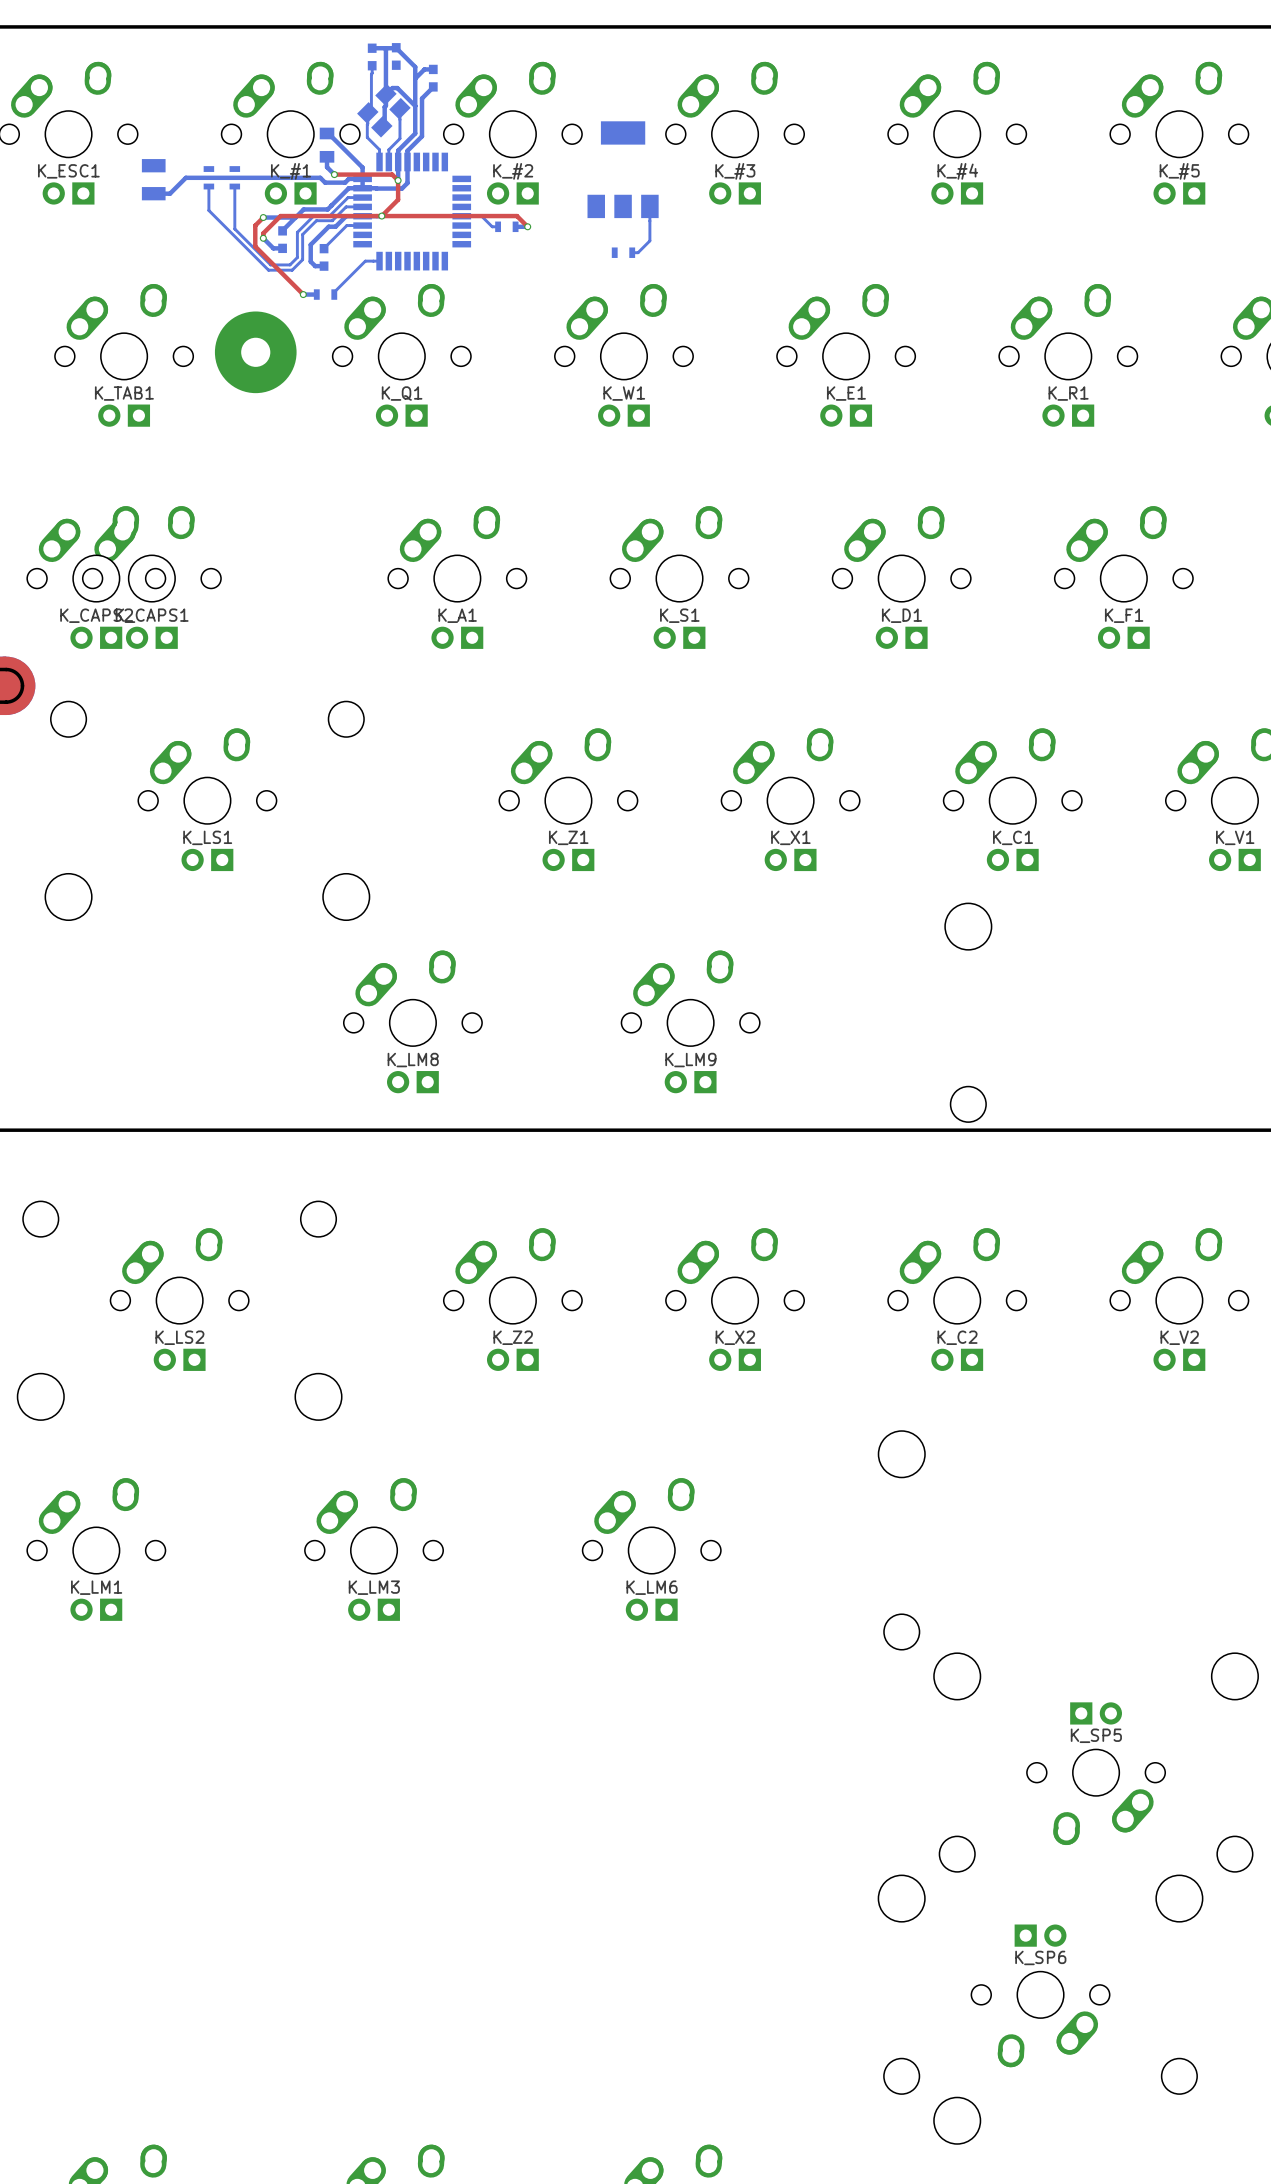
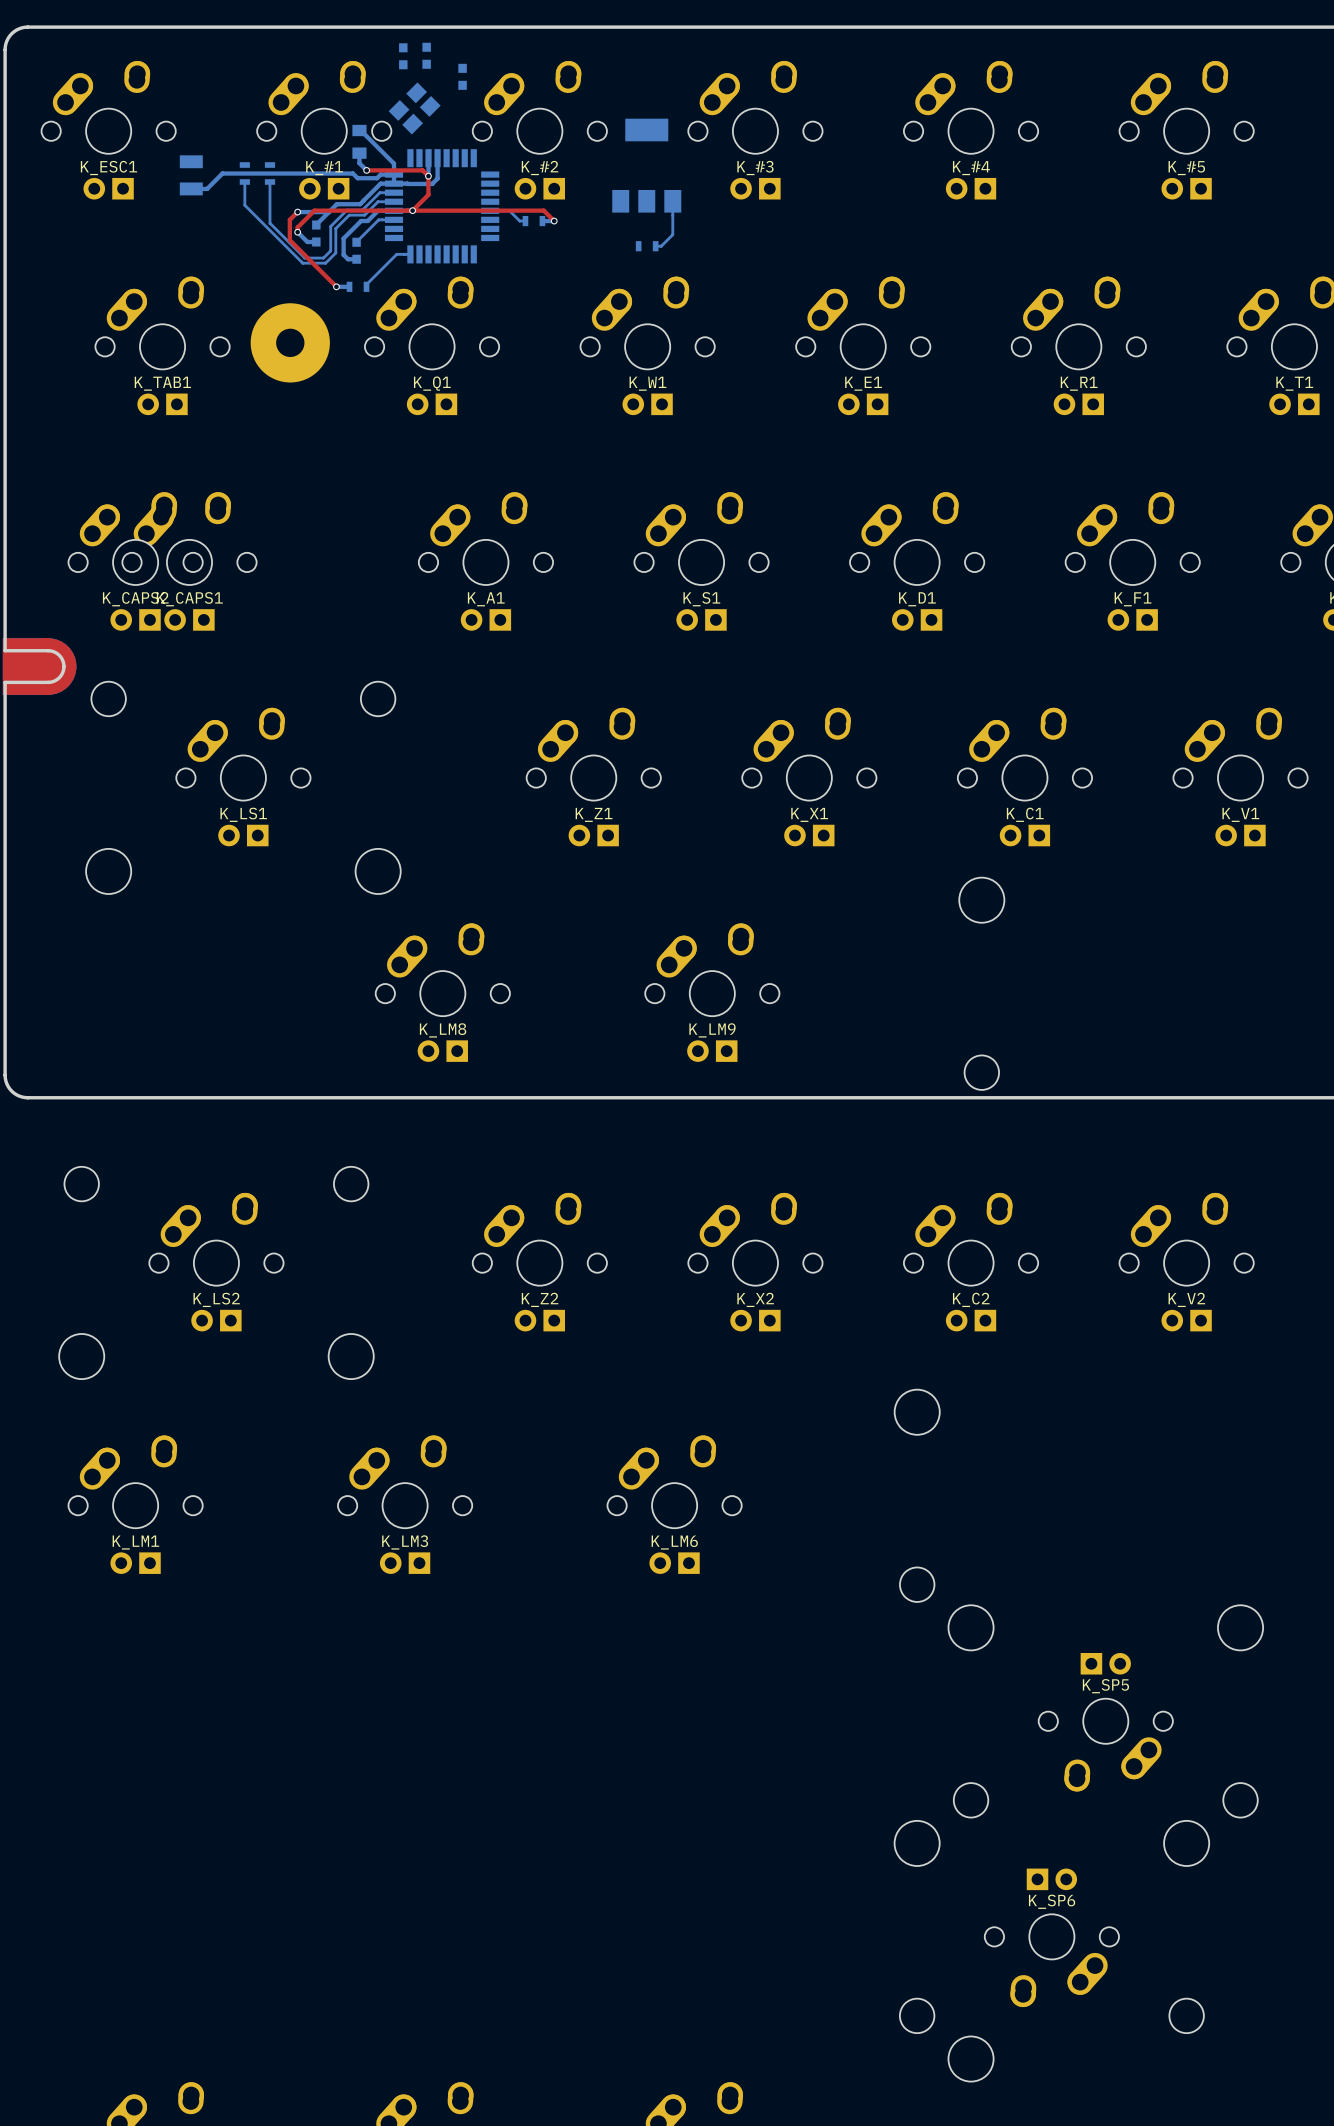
bottom track: (372, 48) (395, 48) -> none
bottom track: (385, 48) (384, 123) -> none
bottom track: (396, 48) (415, 66) (415, 133) (398, 150) (398, 161) -> none
bottom track: (372, 65) (371, 109) -> none
bottom track: (433, 69) (424, 69) (415, 78) -> none
bottom track: (433, 87) (422, 98) (422, 136) (407, 150) (407, 161) -> none
bottom track: (385, 94) (392, 88) (397, 88) (415, 105) -> none
bottom track: (399, 108) (399, 138) (388, 149) (388, 161) -> none
bottom track: (367, 112) (367, 137) (379, 149) (379, 161) -> none

